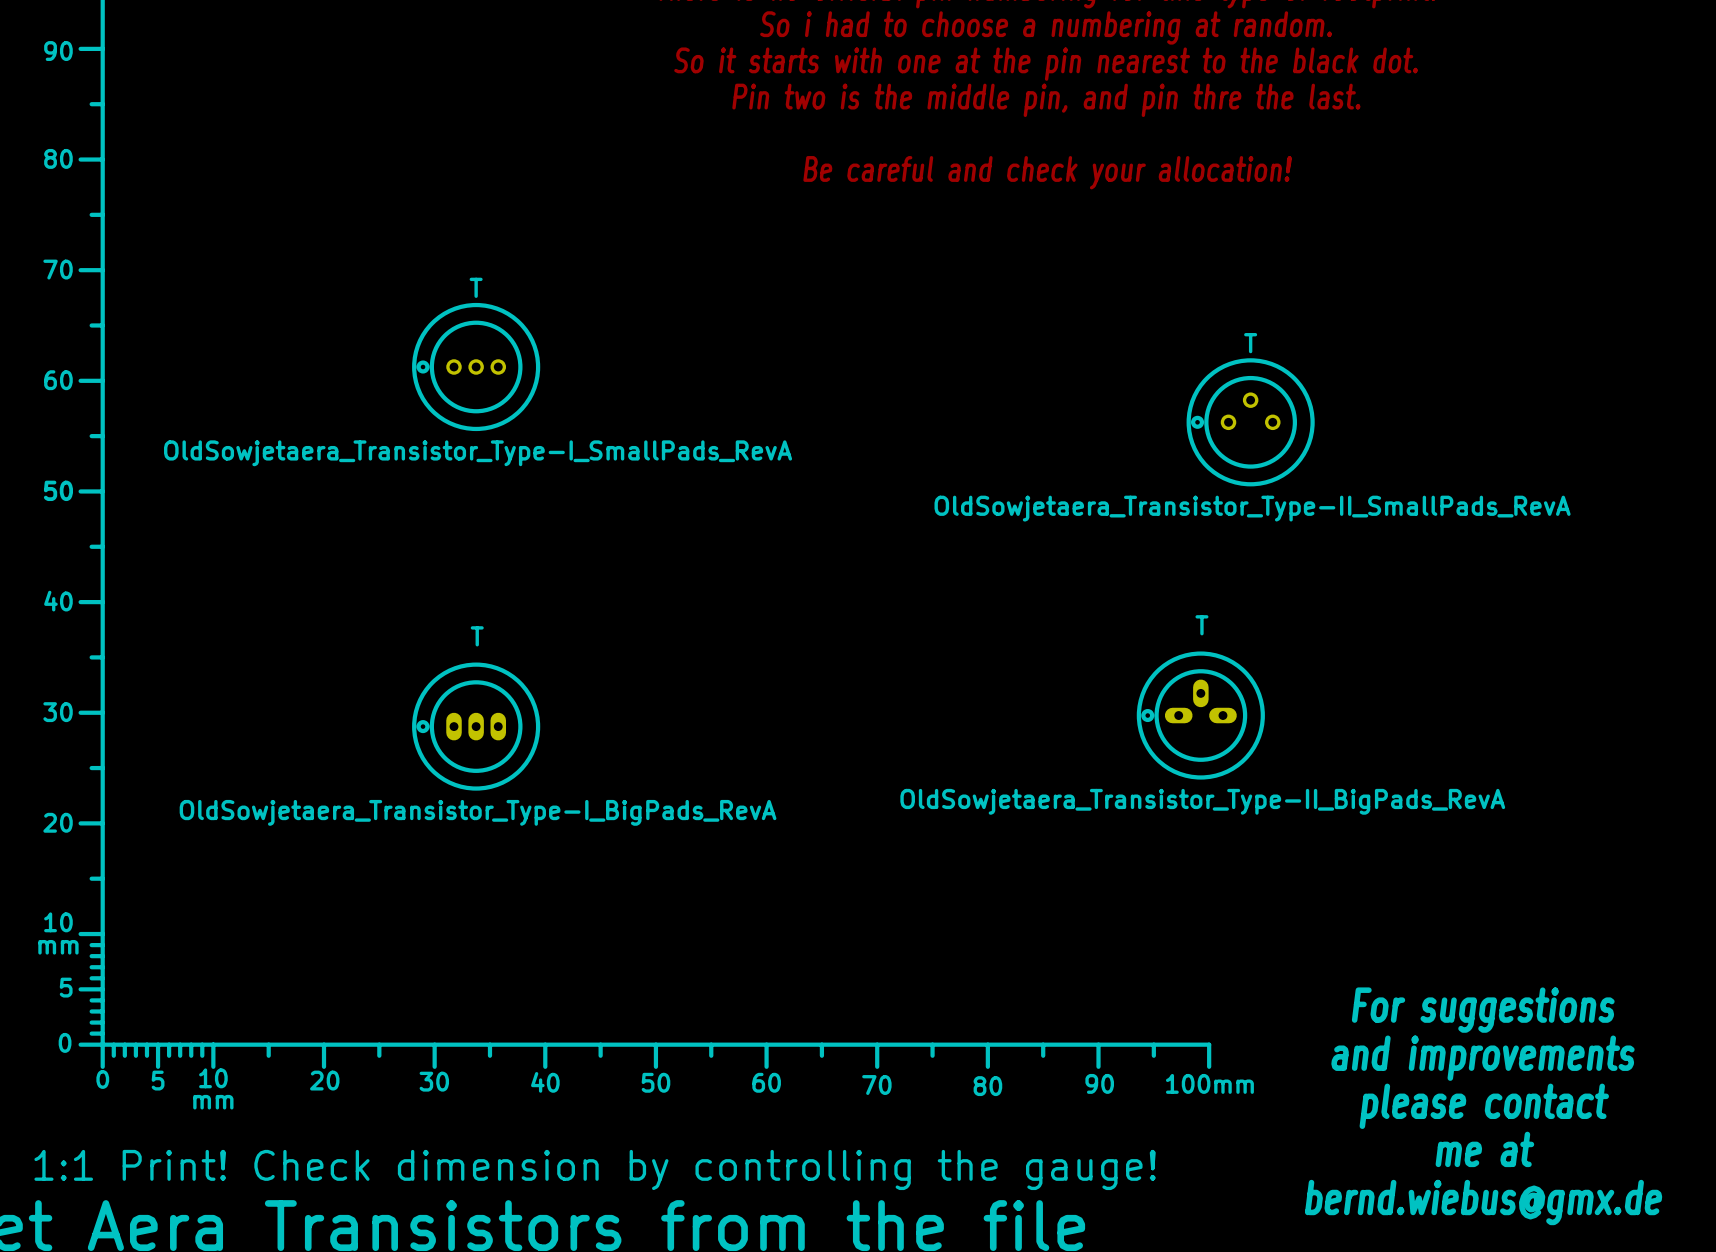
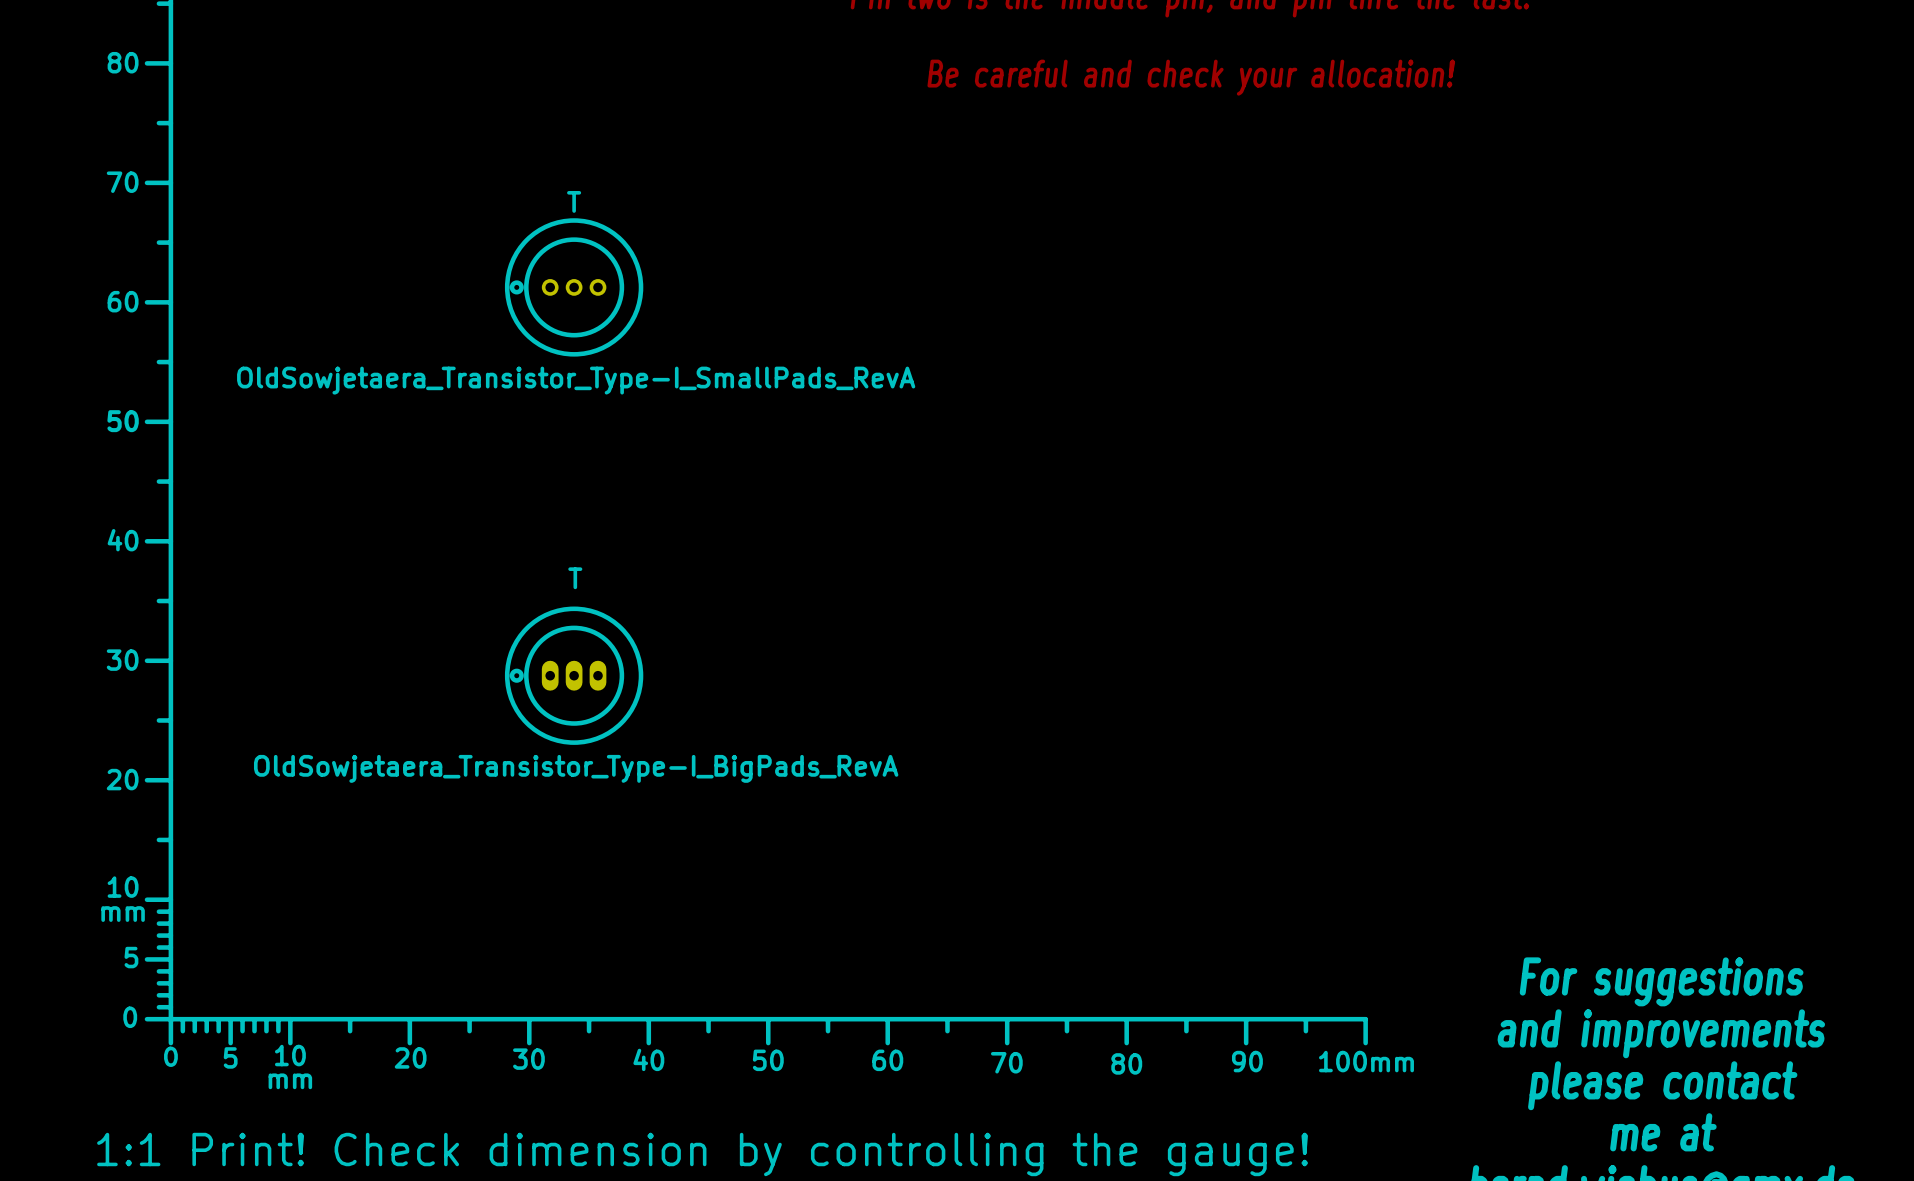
T: OldSowjetaera_Transistor_Type-II_SmallPads_RevA (1250, 422) -> none
T: OldSowjetaera_Transistor_Type-II_BigPads_RevA (1200, 715) -> none

